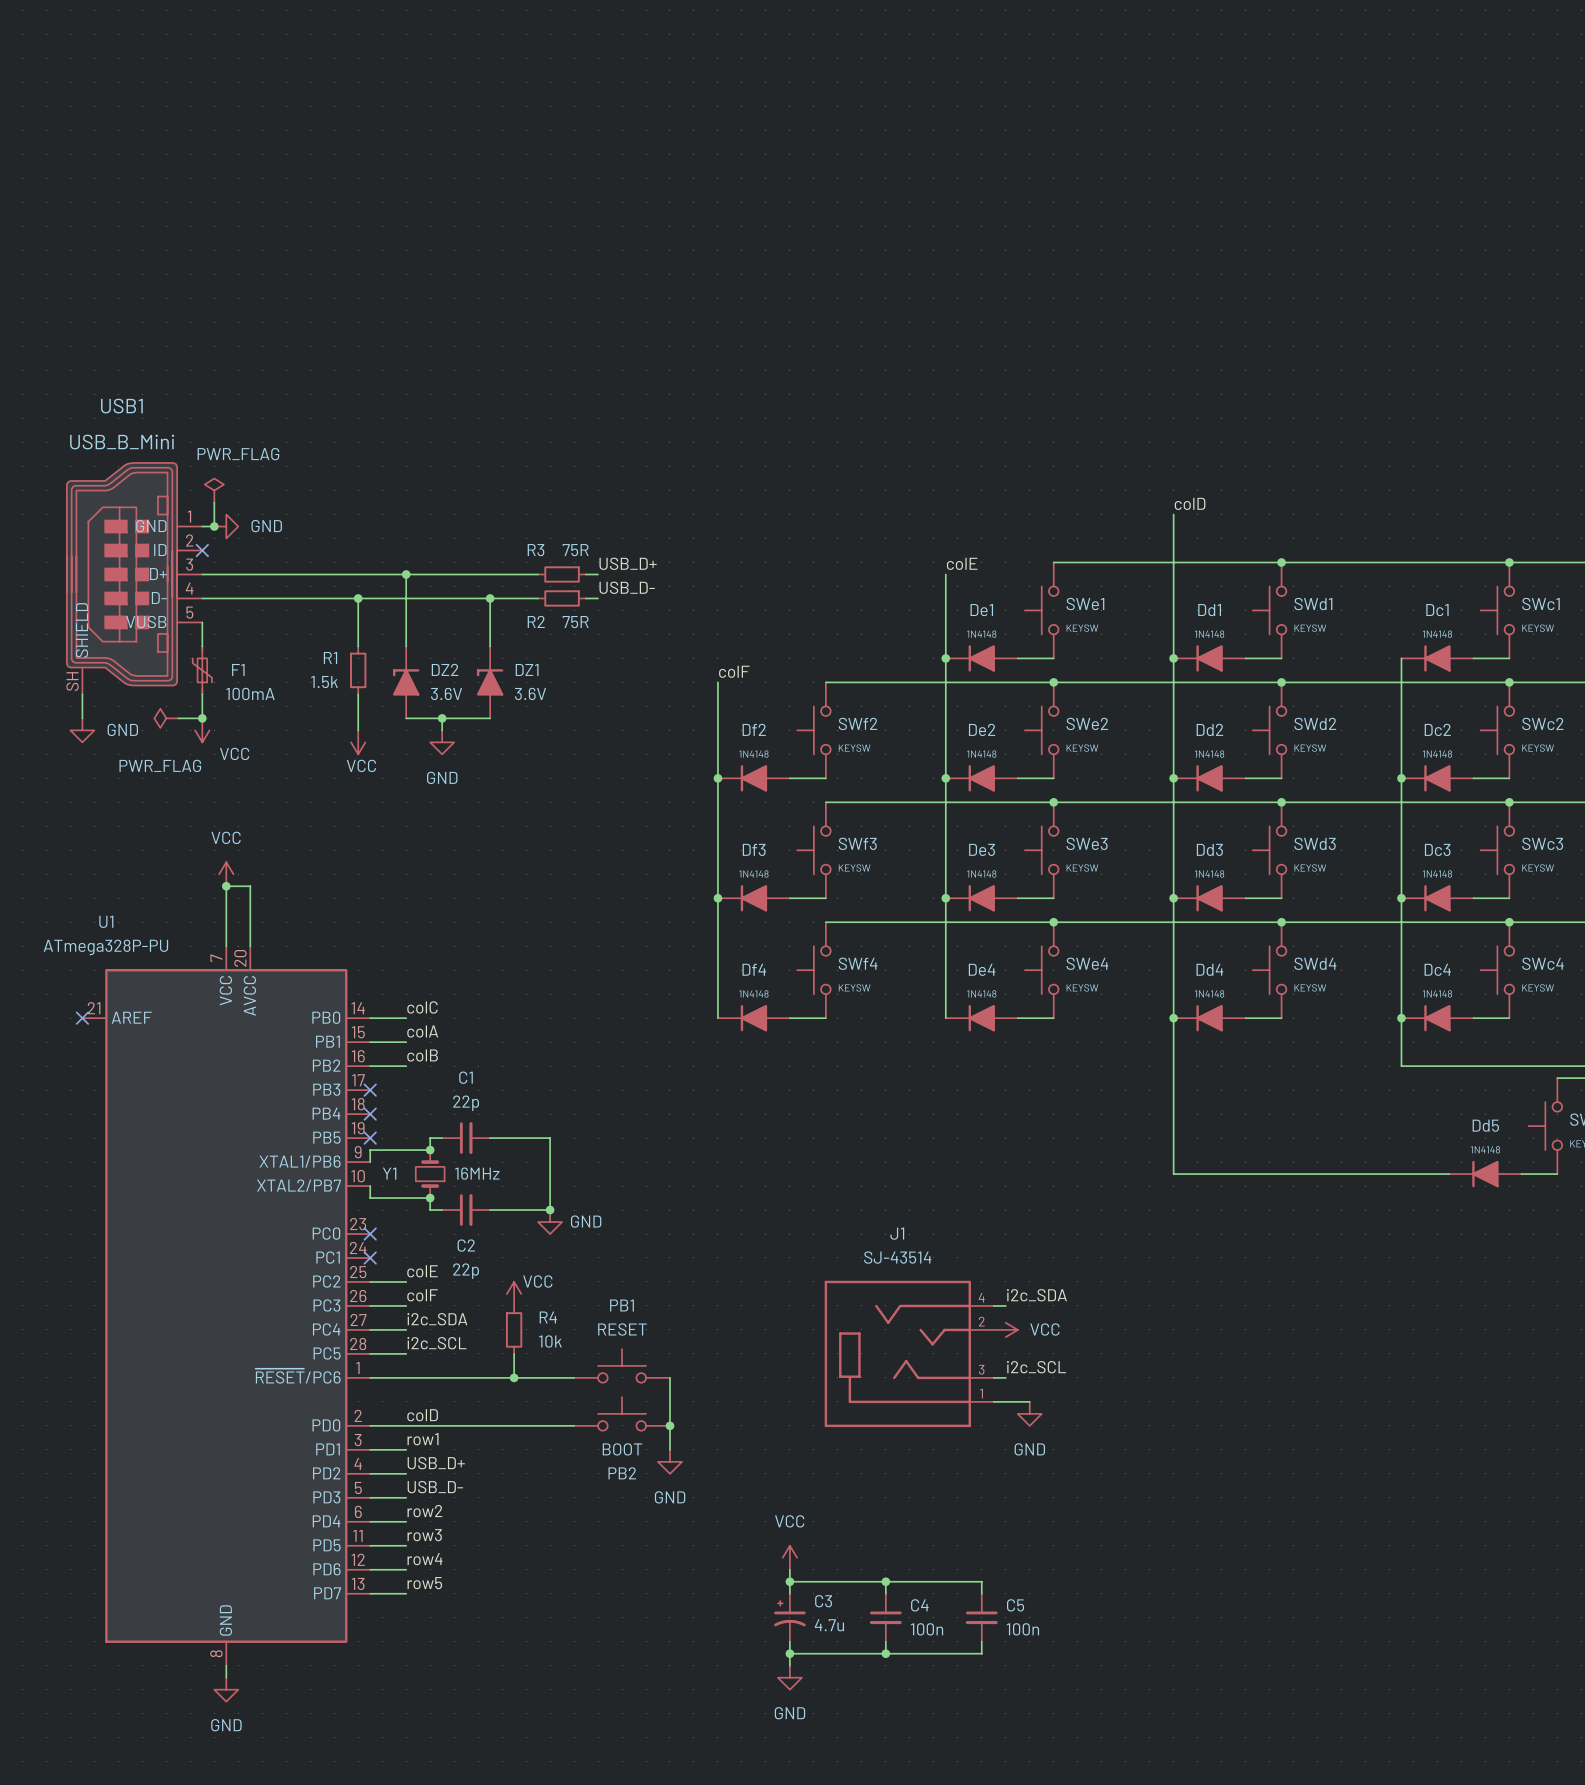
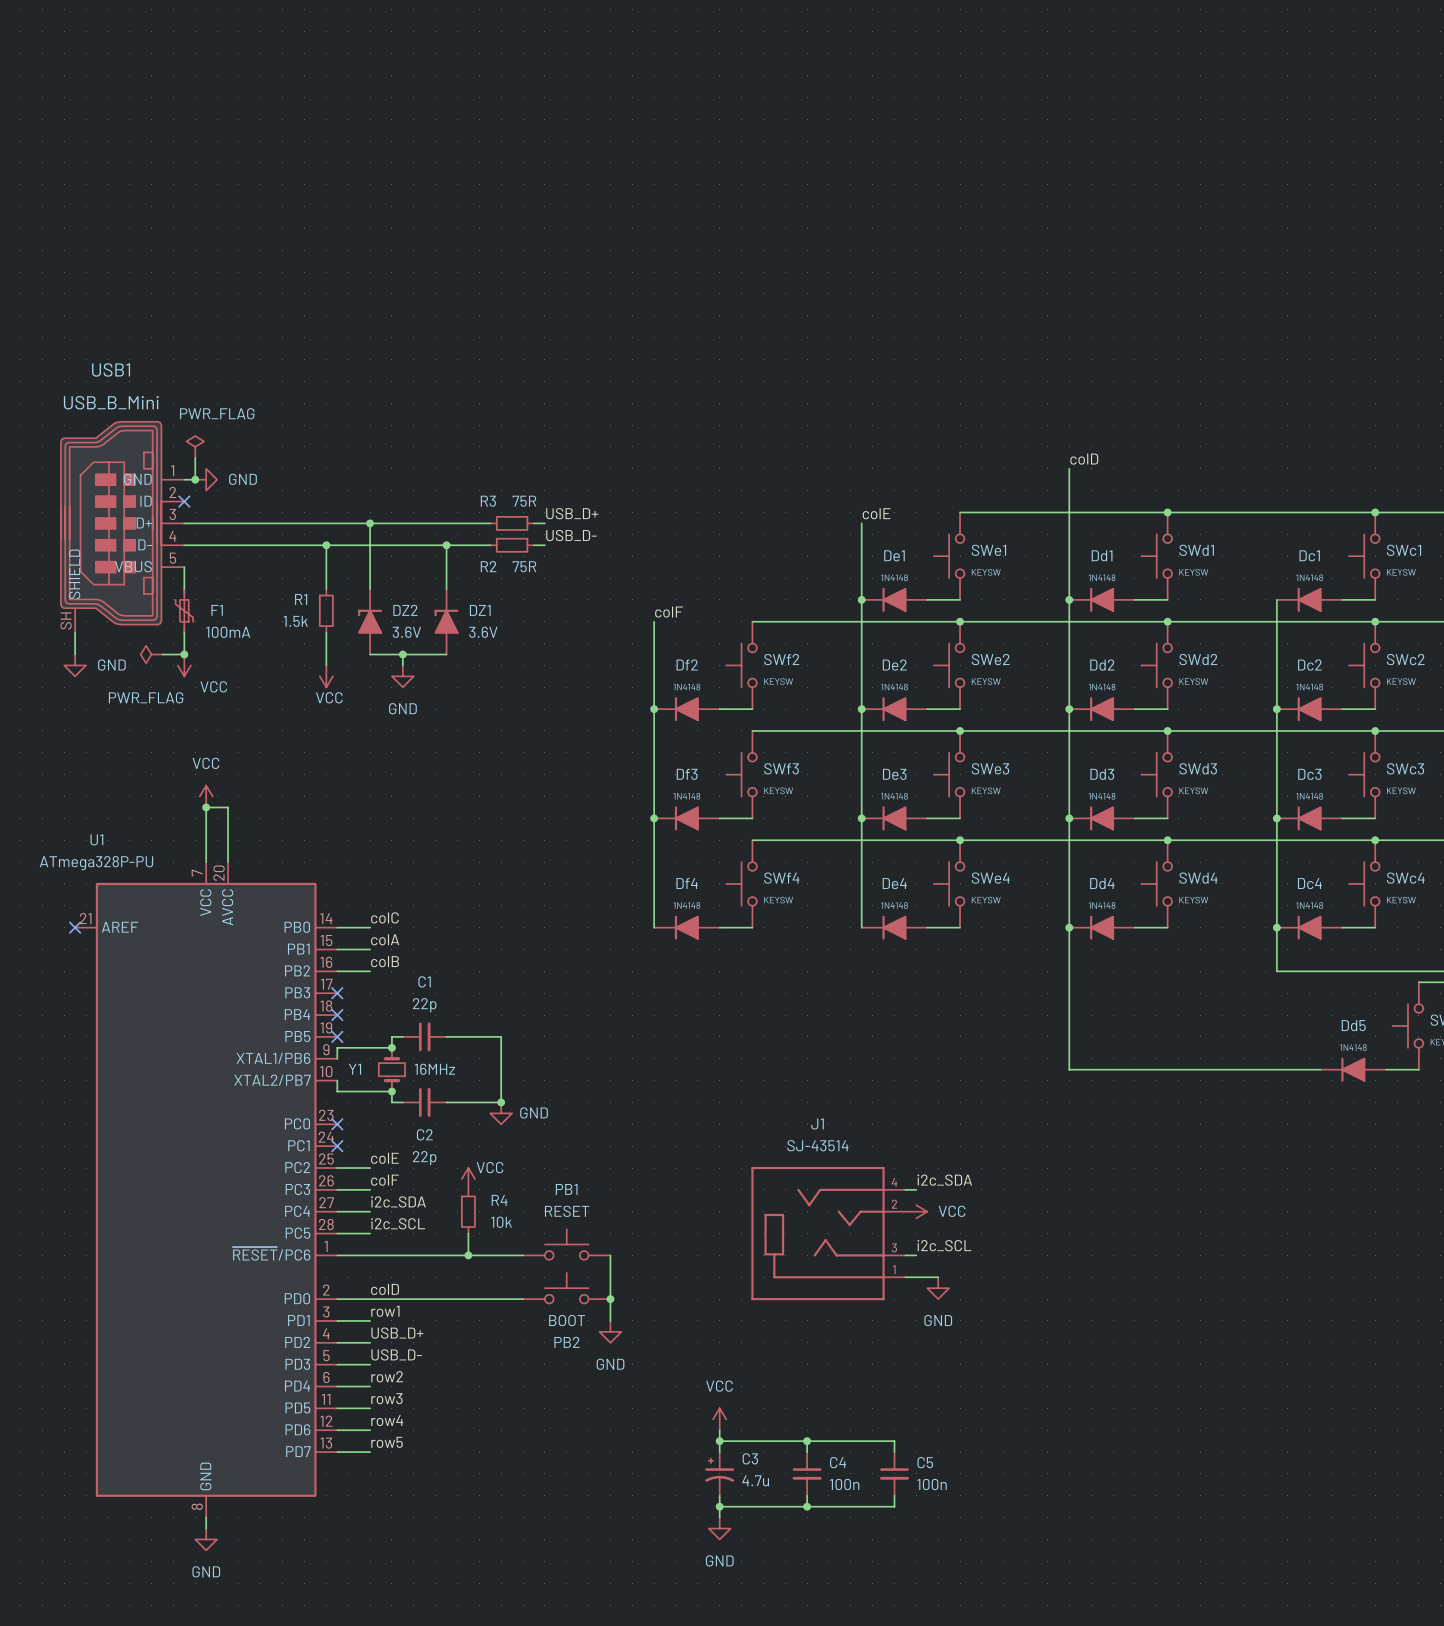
USB1 pin name: VUSB (146, 622) -> VBUS (133, 566)

